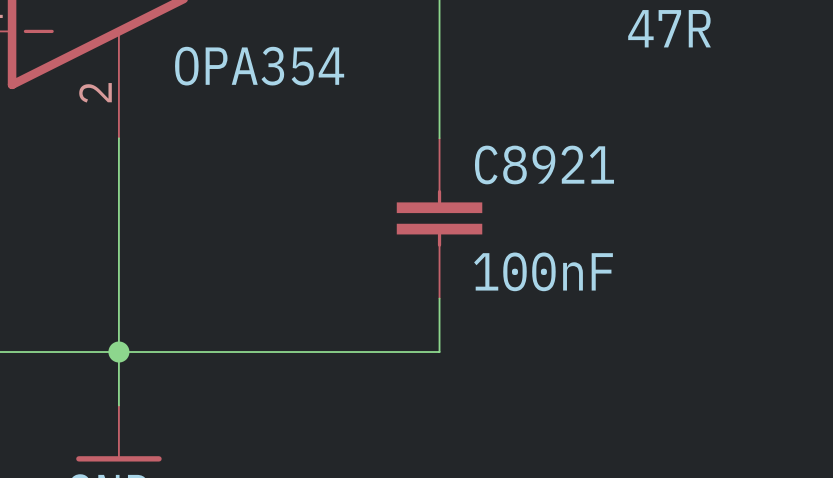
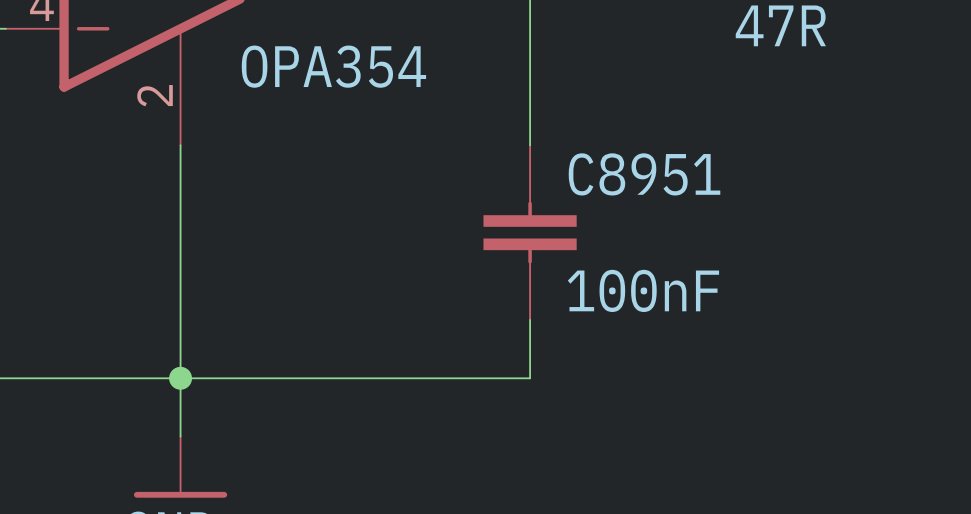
C8921 name: C8921 (544, 164) -> C8951 (644, 174)

